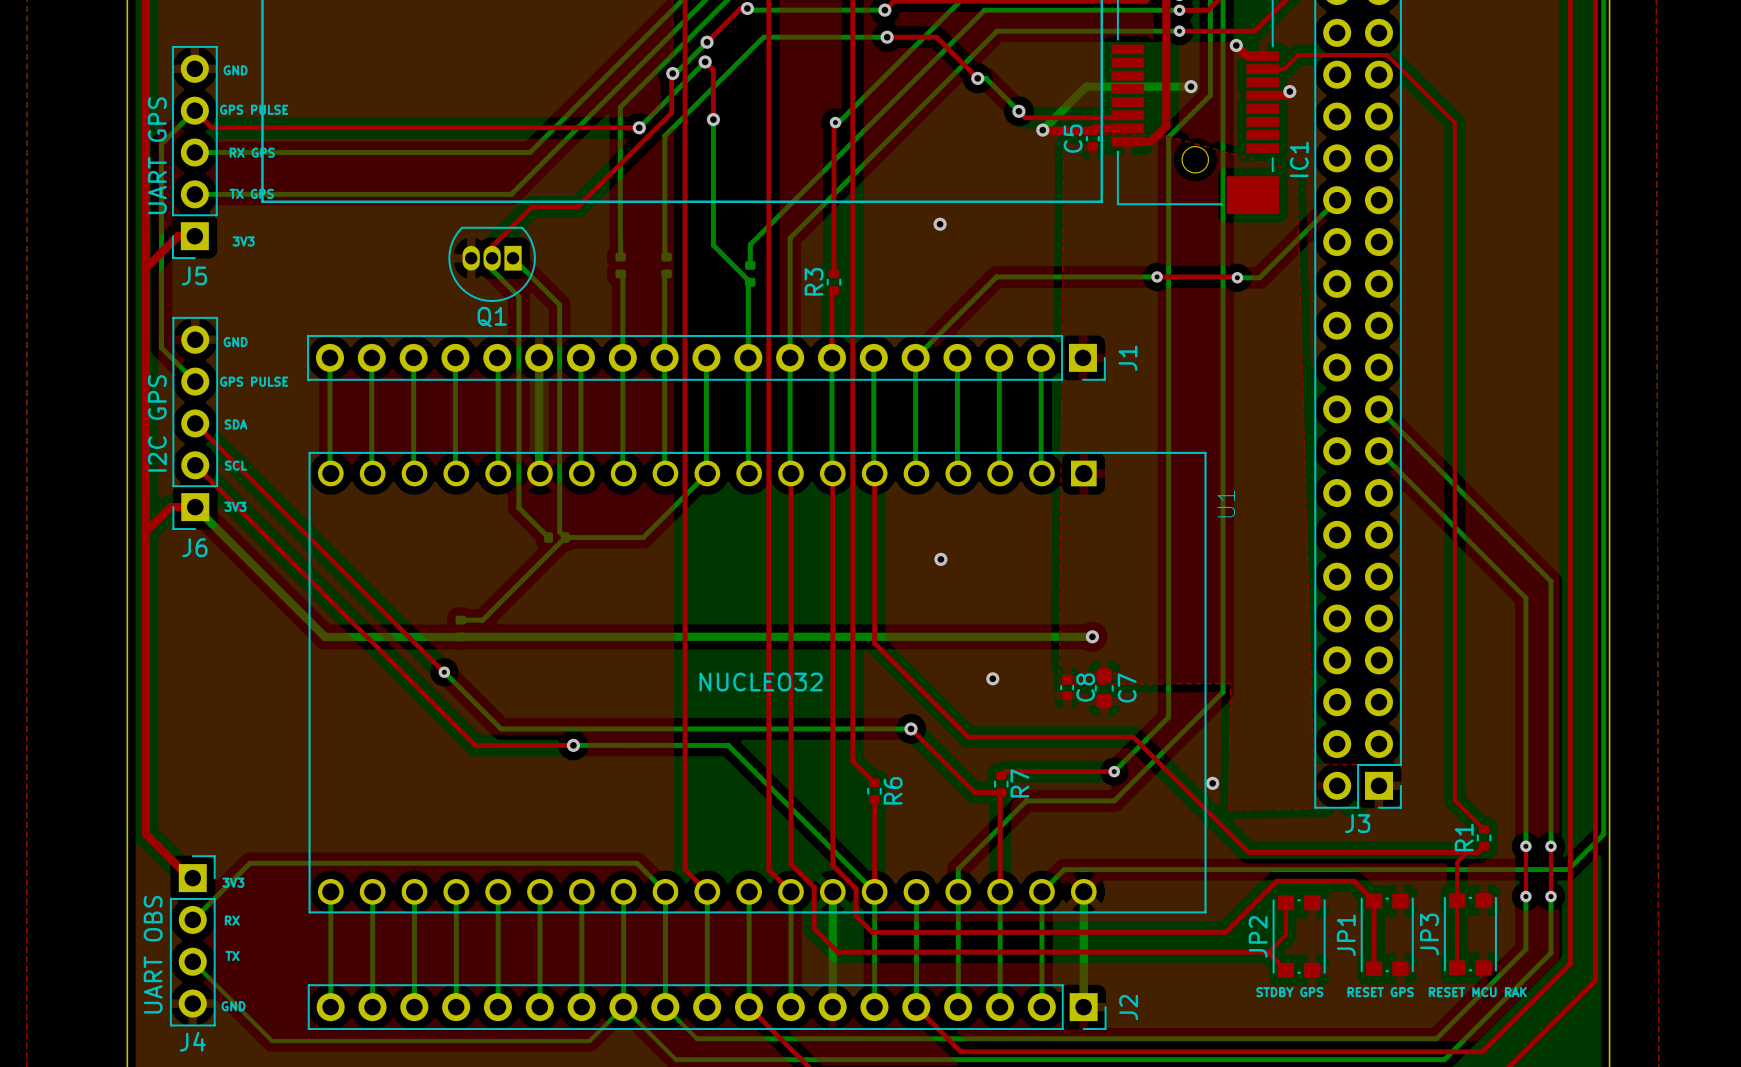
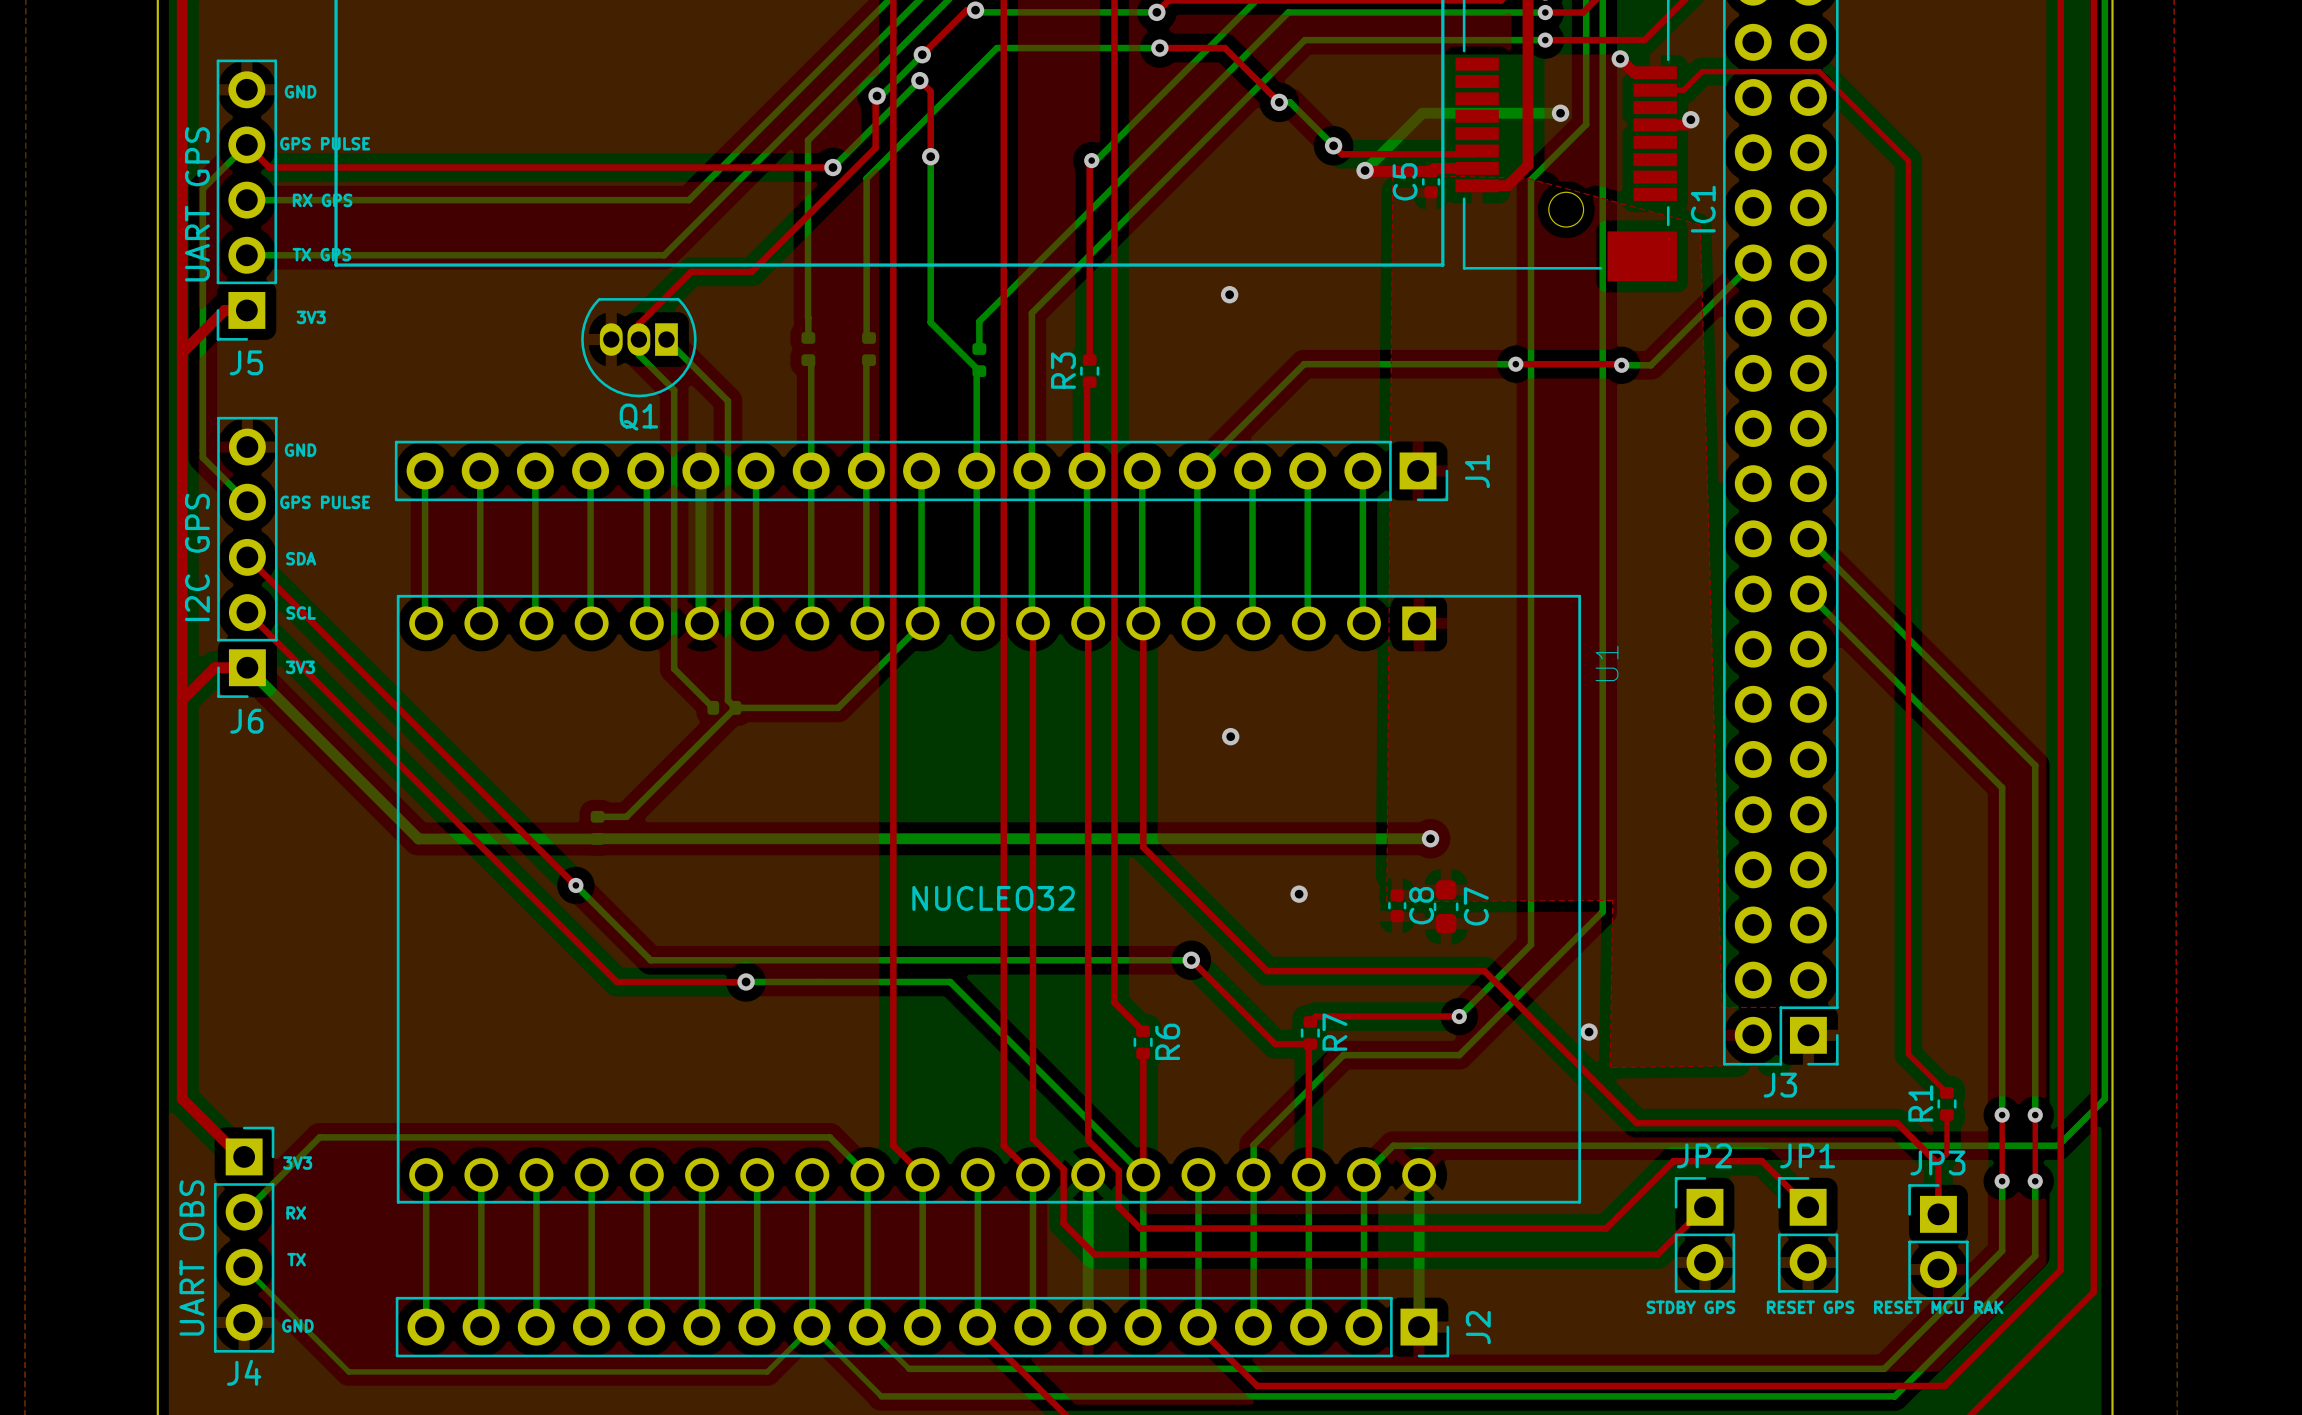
top track: (1484, 846) (1477, 852) (1446, 852) -> (1946, 1115) (1946, 1153) (1937, 1163)
top track: none -> (1897, 1123) (1938, 1164) (1938, 1214)
top track: (1467, 852) (1457, 862) (1457, 967) -> none
top track: (1343, 881) (1354, 881) (1374, 901) (1374, 968) -> (1761, 1161) (1808, 1207)
JP3 footprint: [1443, 892, 1497, 976] -> [1908, 1184, 1969, 1300]
JP1 footprint: [1360, 893, 1414, 977] -> [1777, 1177, 1839, 1293]
JP2 footprint: [1272, 895, 1326, 978] -> [1674, 1177, 1736, 1293]
top track: (1285, 902) (1285, 934) (1268, 952) -> none
JP3 name position: JP3 (1429, 934) -> JP3 (1937, 1162)
JP1 name position: JP1 (1346, 935) -> JP1 (1807, 1155)
JP2 name position: JP2 (1258, 936) -> JP2 (1704, 1155)
top track: (1264, 952) (1267, 952) (1285, 970) -> (1657, 1254) (1704, 1207)

